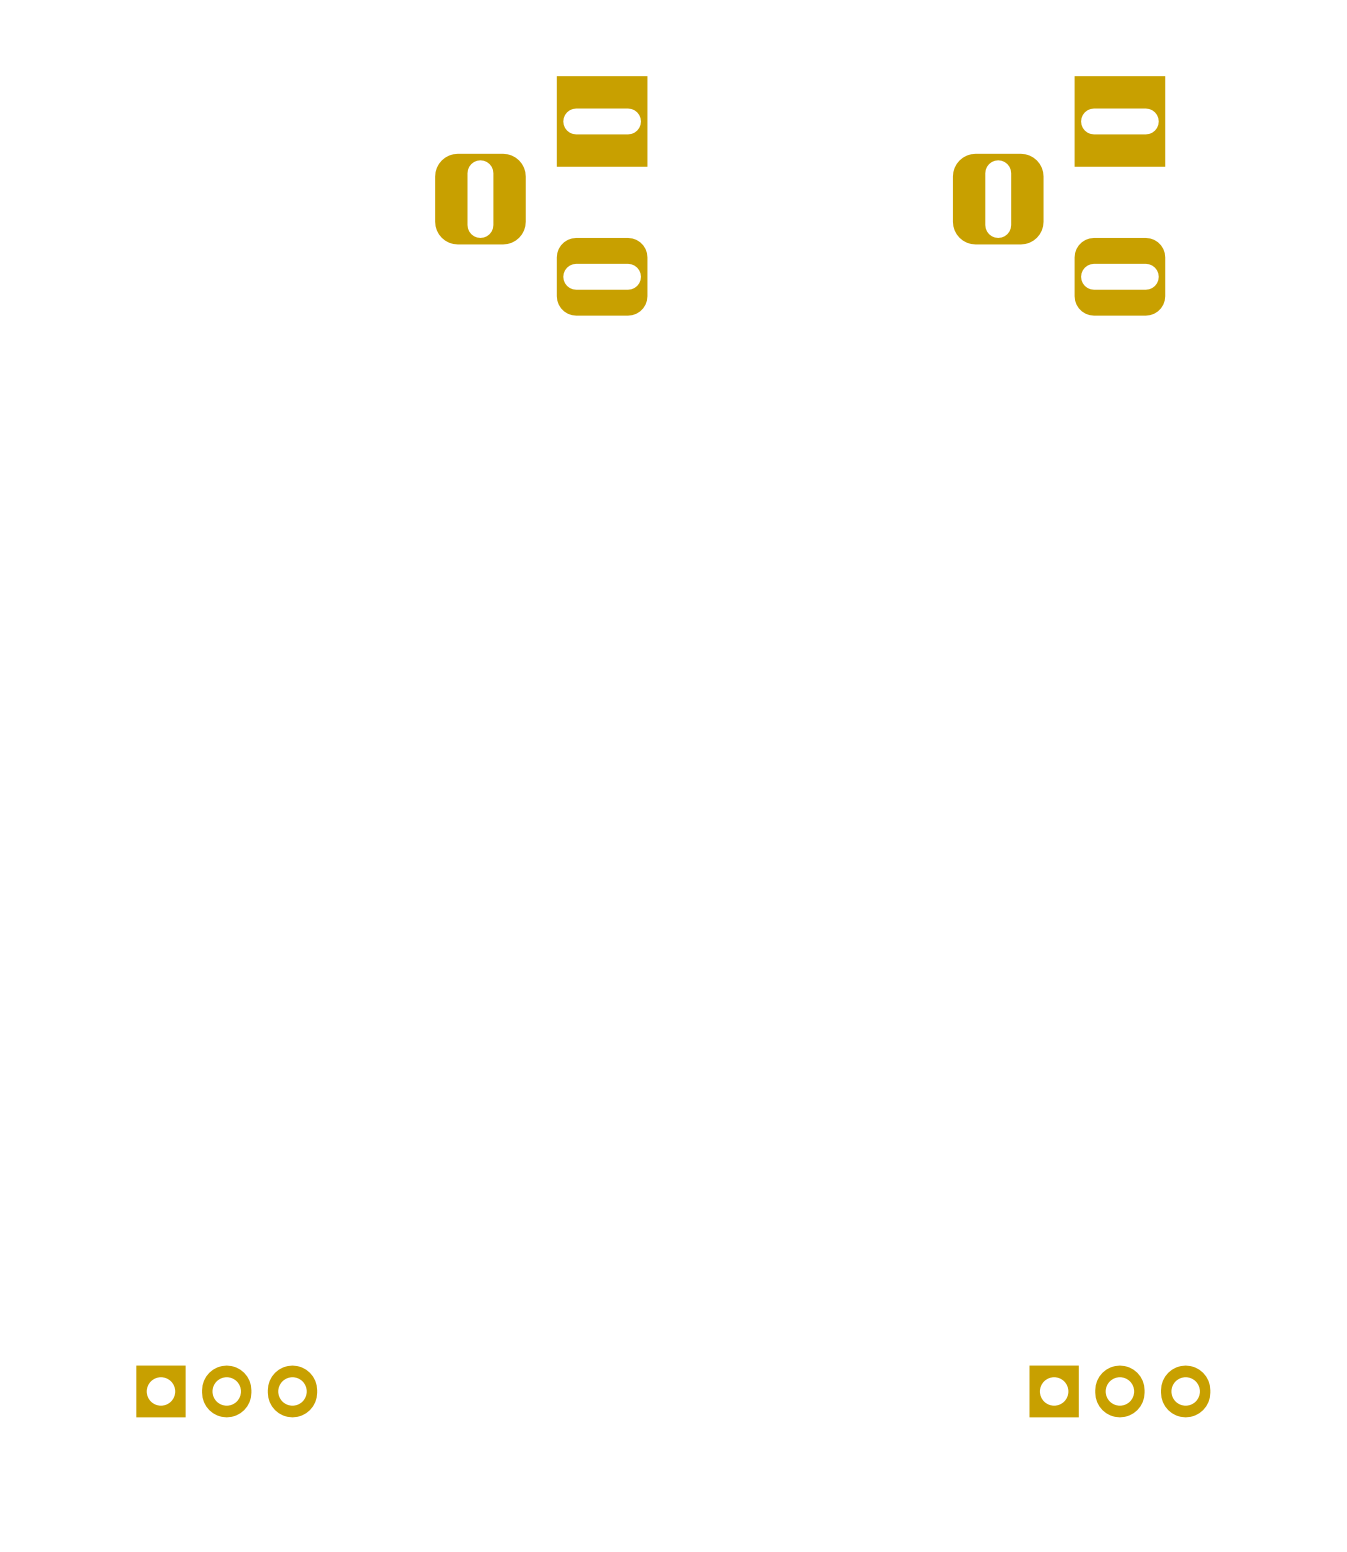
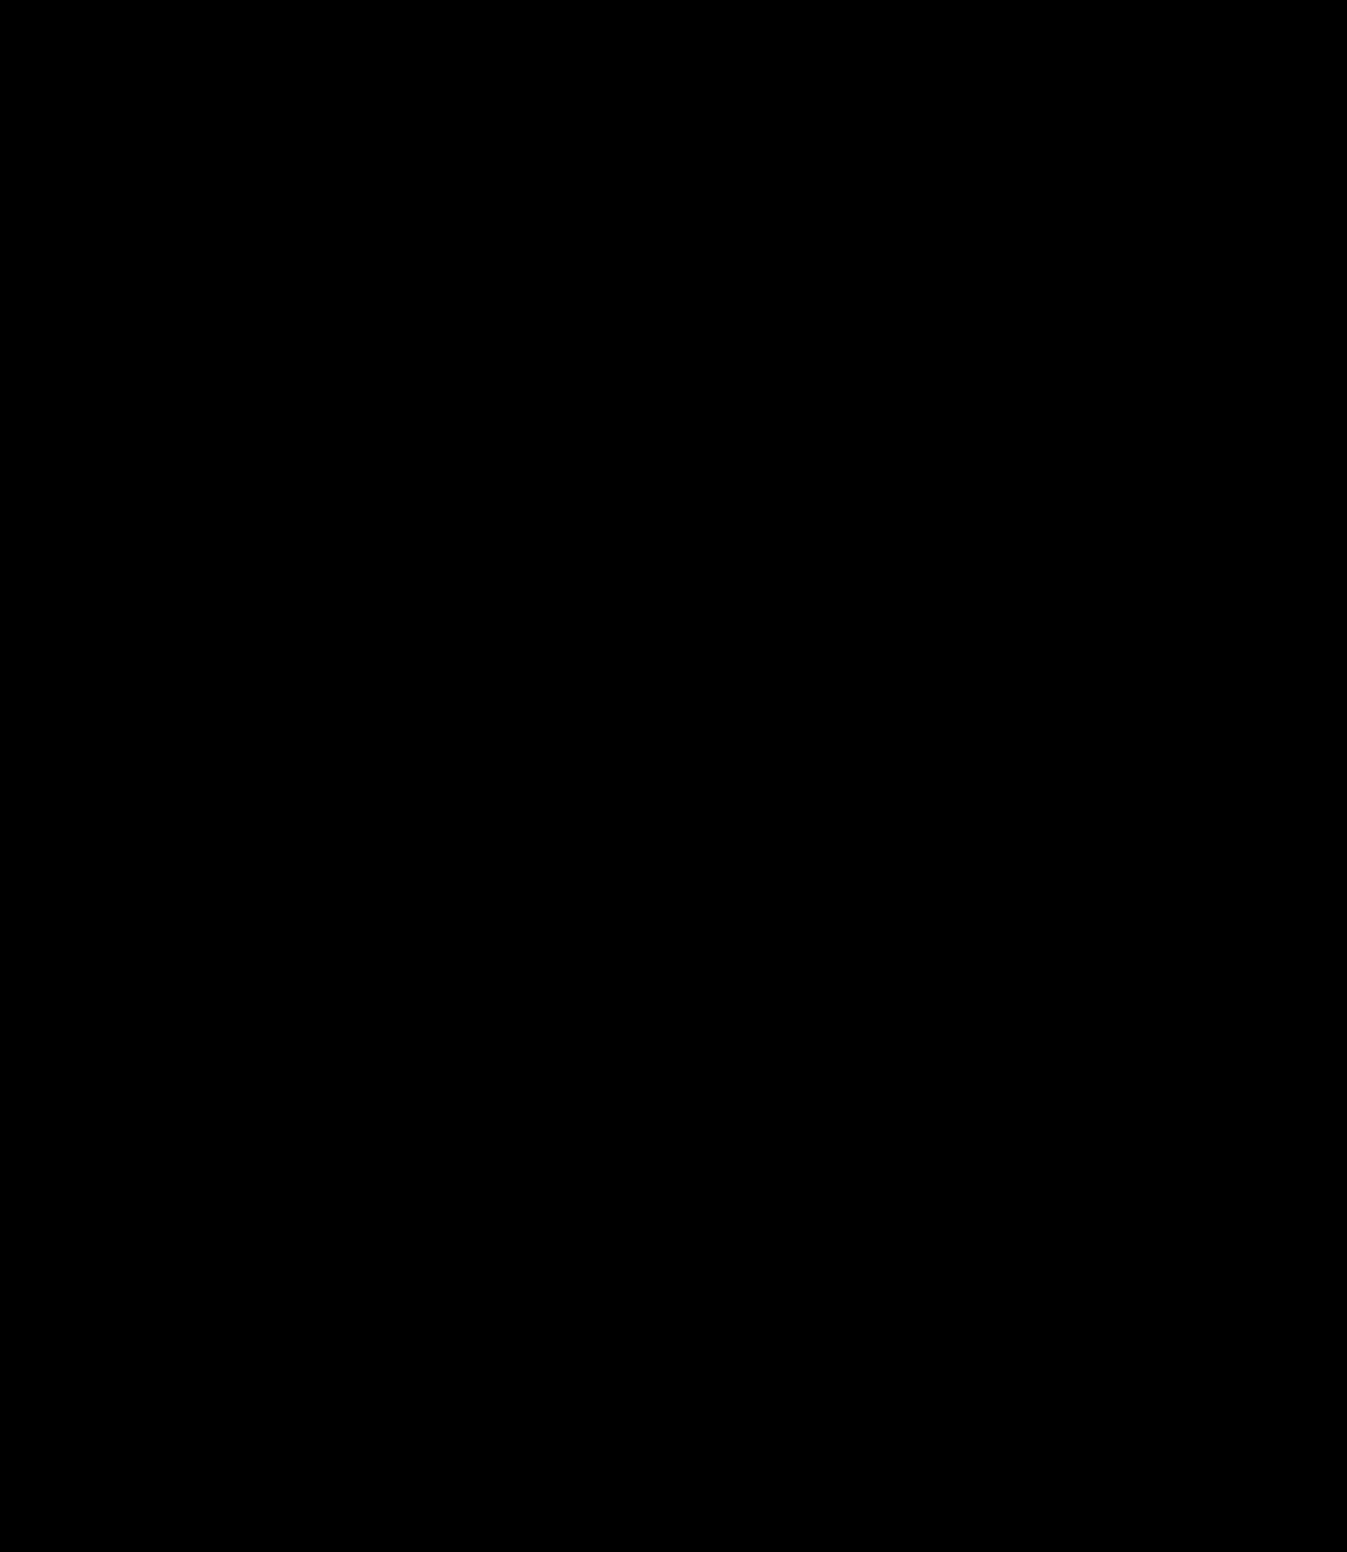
part: (541, 195) -> none
part: (1059, 195) -> none
part: (226, 1391) -> none
part: (1119, 1391) -> none

